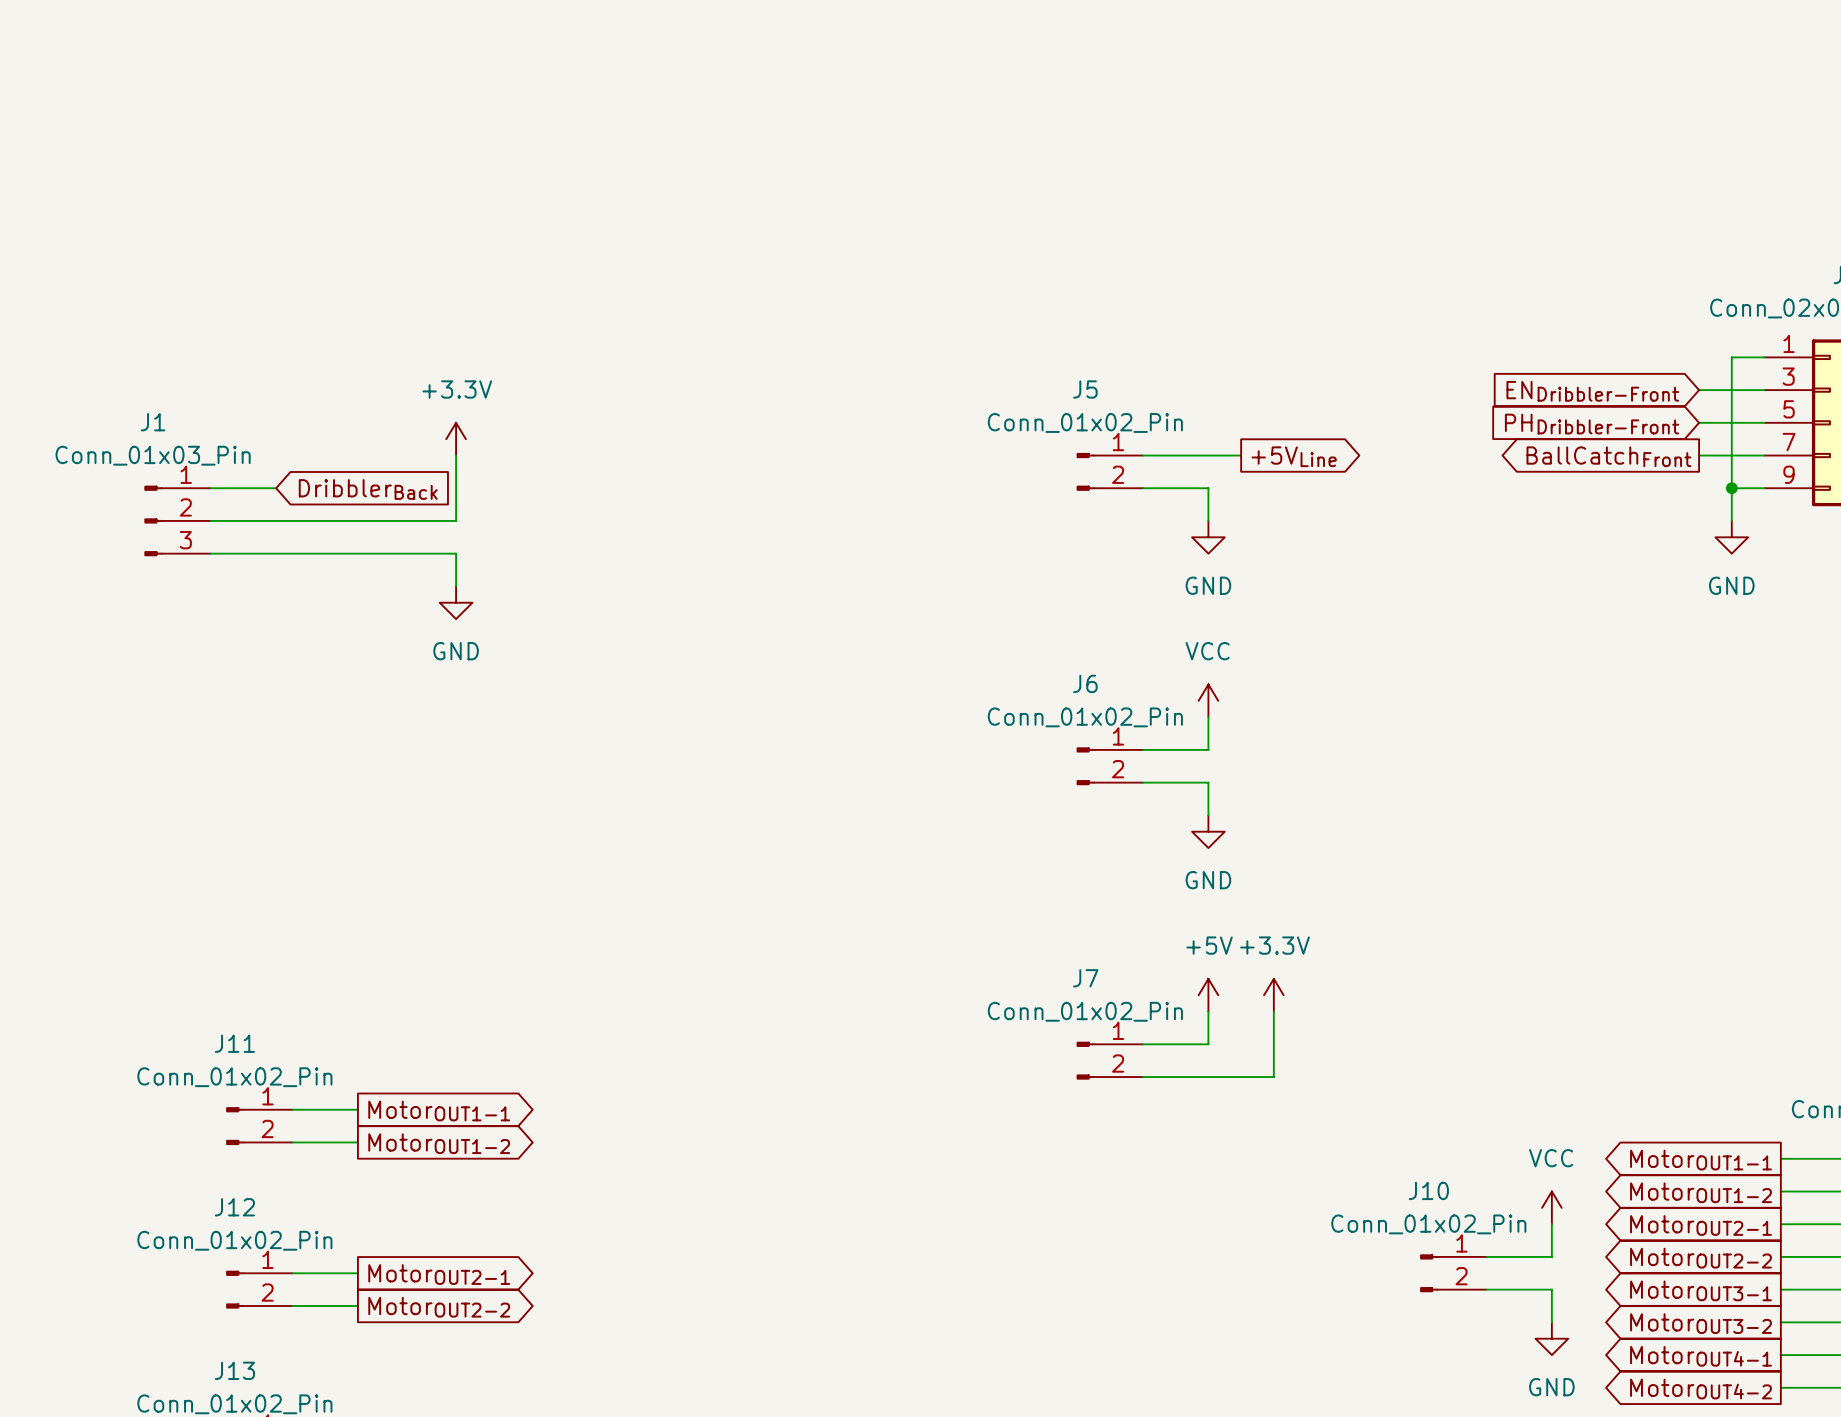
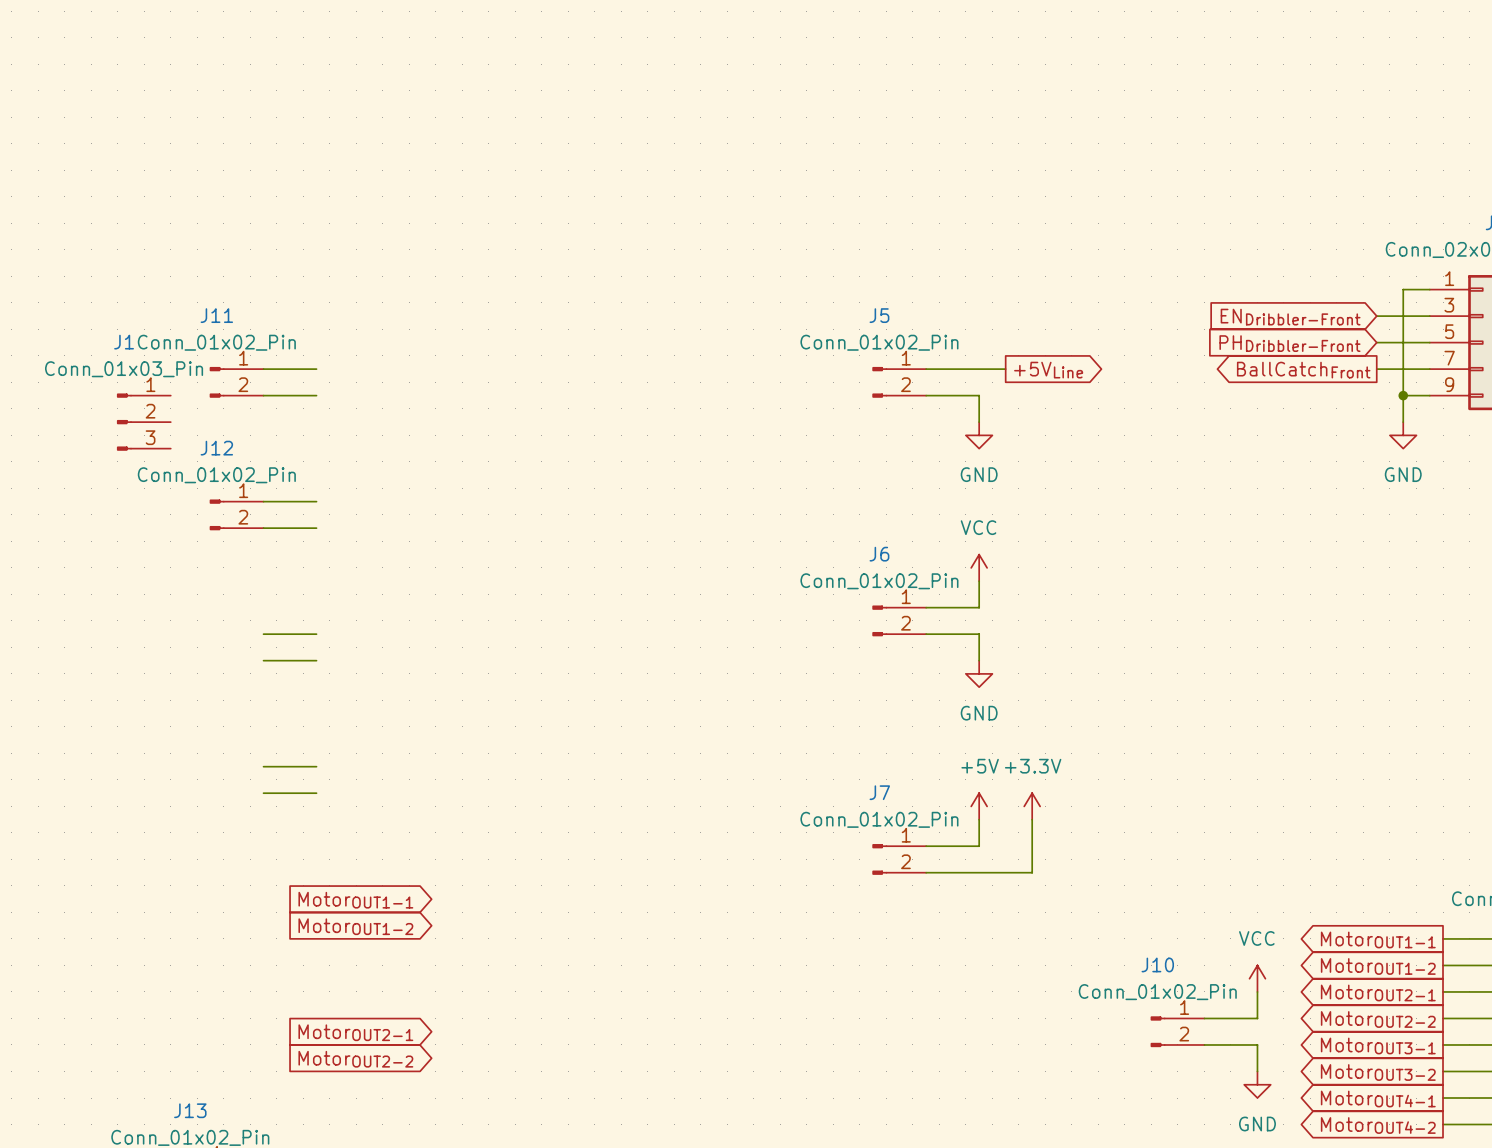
power symbol: +3.3V (456, 439) -> none
wire: none -> (263, 369) (316, 369)
wire: (456, 455) (456, 520) (210, 520) -> none
wire: (210, 488) (276, 488) -> (263, 395) (316, 395)
global label: DribblerBack (368, 489) -> none
wire: (210, 553) (456, 553) (456, 586) -> none
power symbol: GND (456, 602) -> none
wire: none -> (263, 501) (316, 501)
wire: none -> (263, 528) (316, 528)
wire: none -> (263, 634) (316, 634)
wire: none -> (263, 660) (316, 660)
wire: (292, 1109) (357, 1109) -> (263, 766) (316, 766)
J11 position: (259, 1126) -> (236, 382)
wire: (292, 1142) (357, 1142) -> (263, 793) (316, 793)
wire: (292, 1273) (357, 1273) -> none
J12 position: (259, 1289) -> (236, 514)
wire: (292, 1306) (357, 1306) -> none

